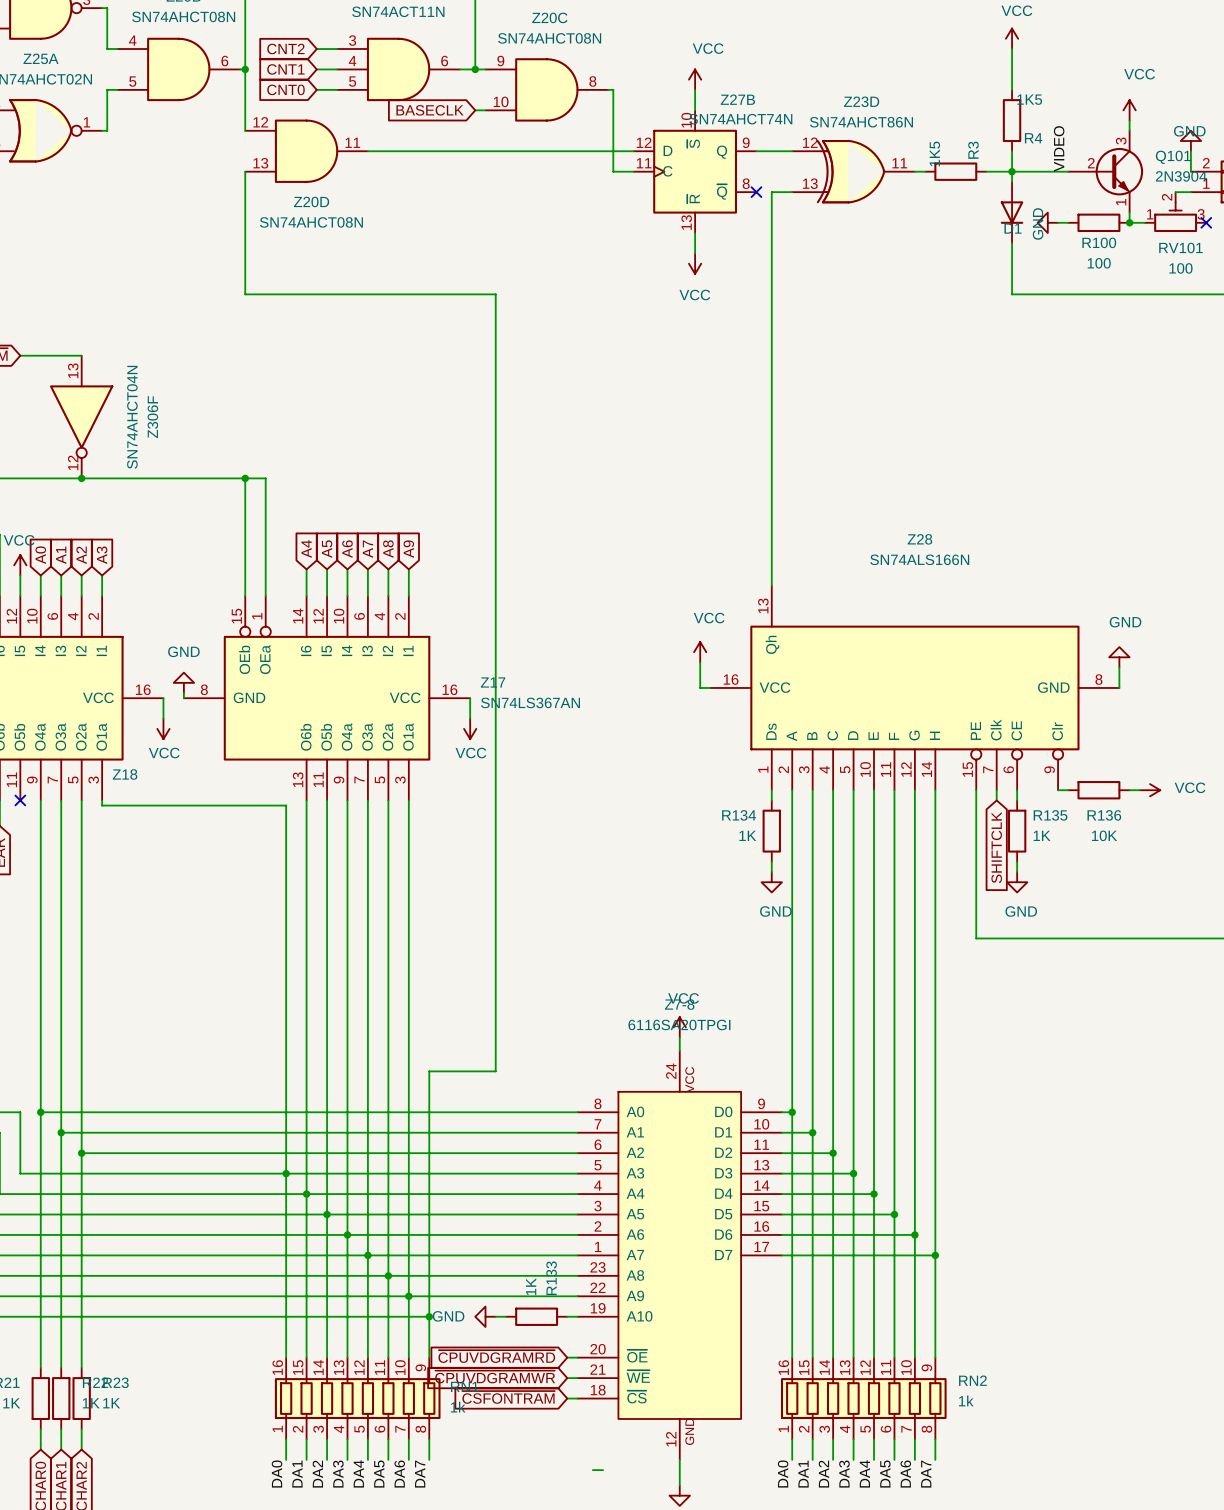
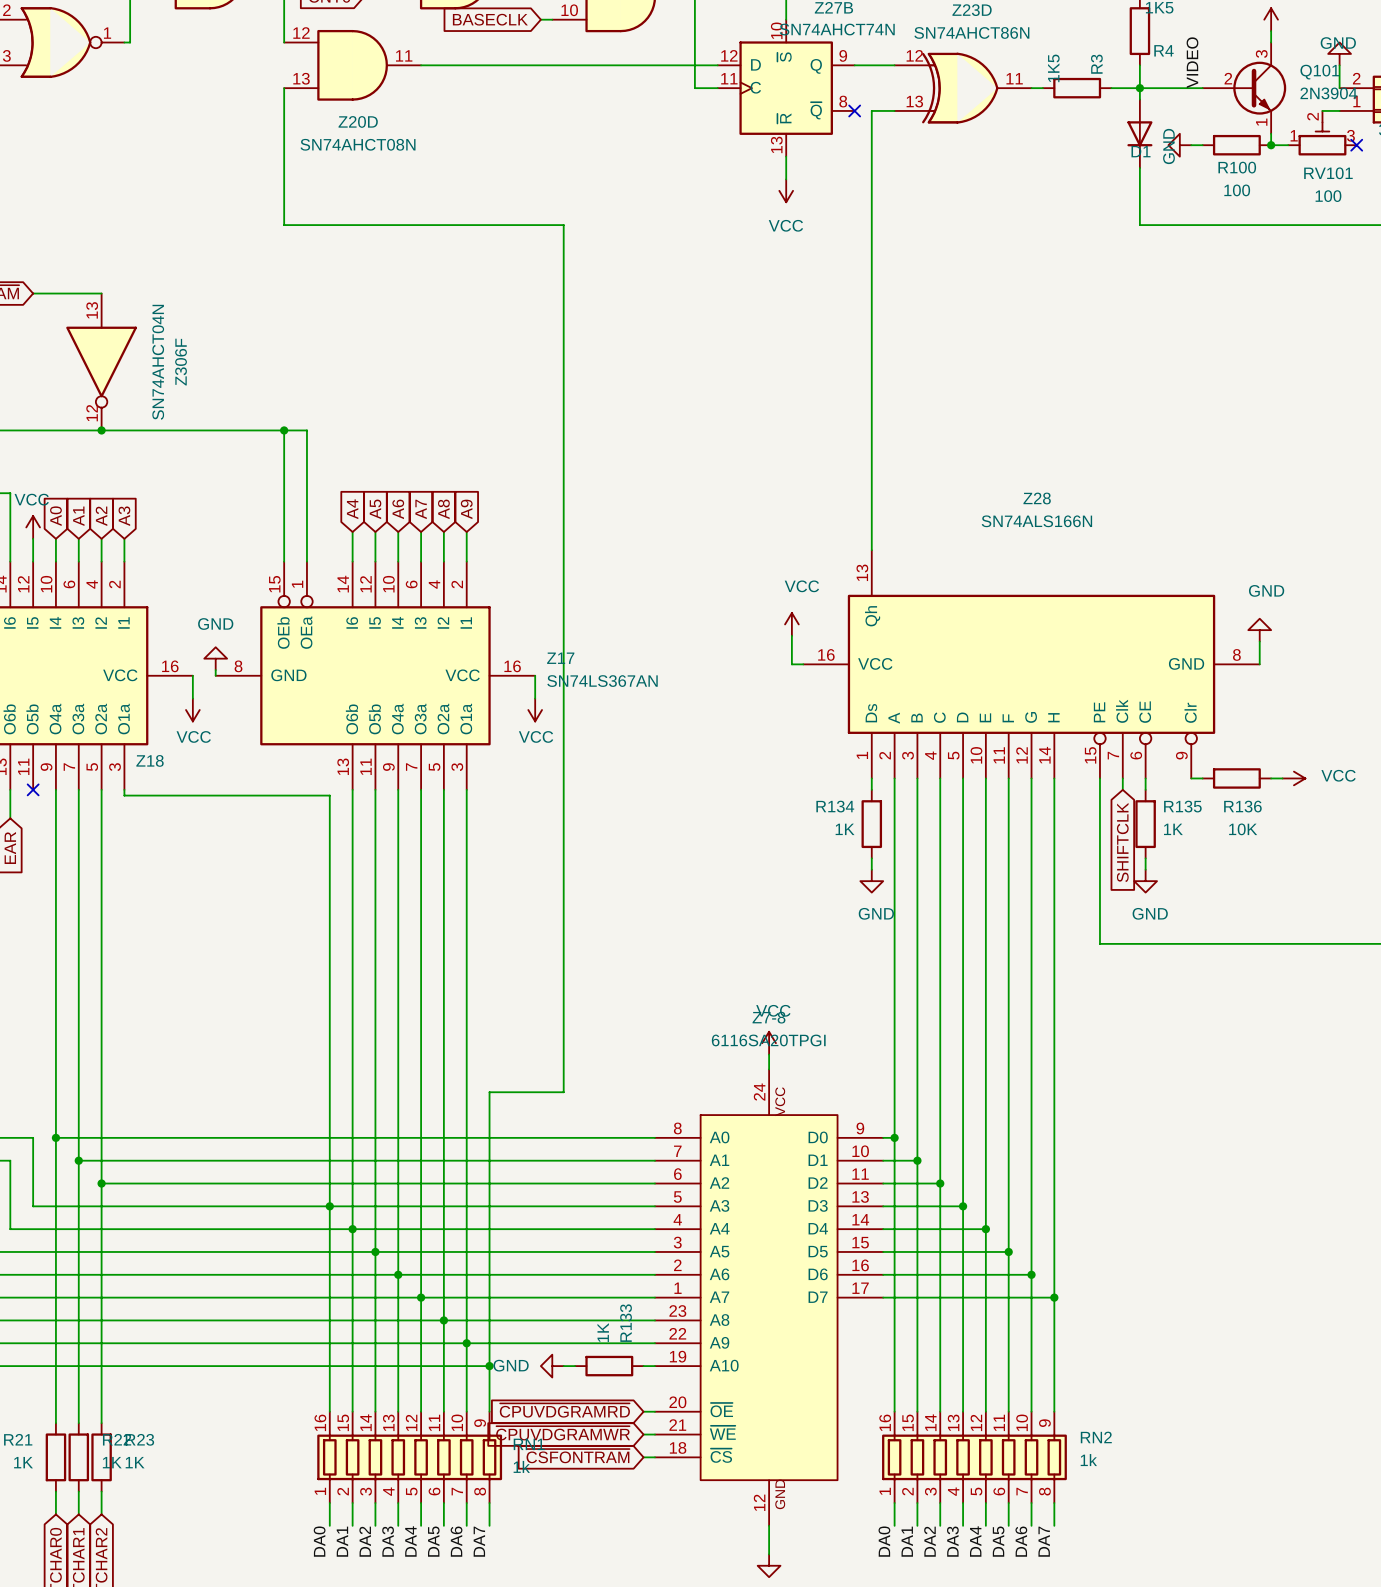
wire: (592, 1470) (603, 1470) -> none

